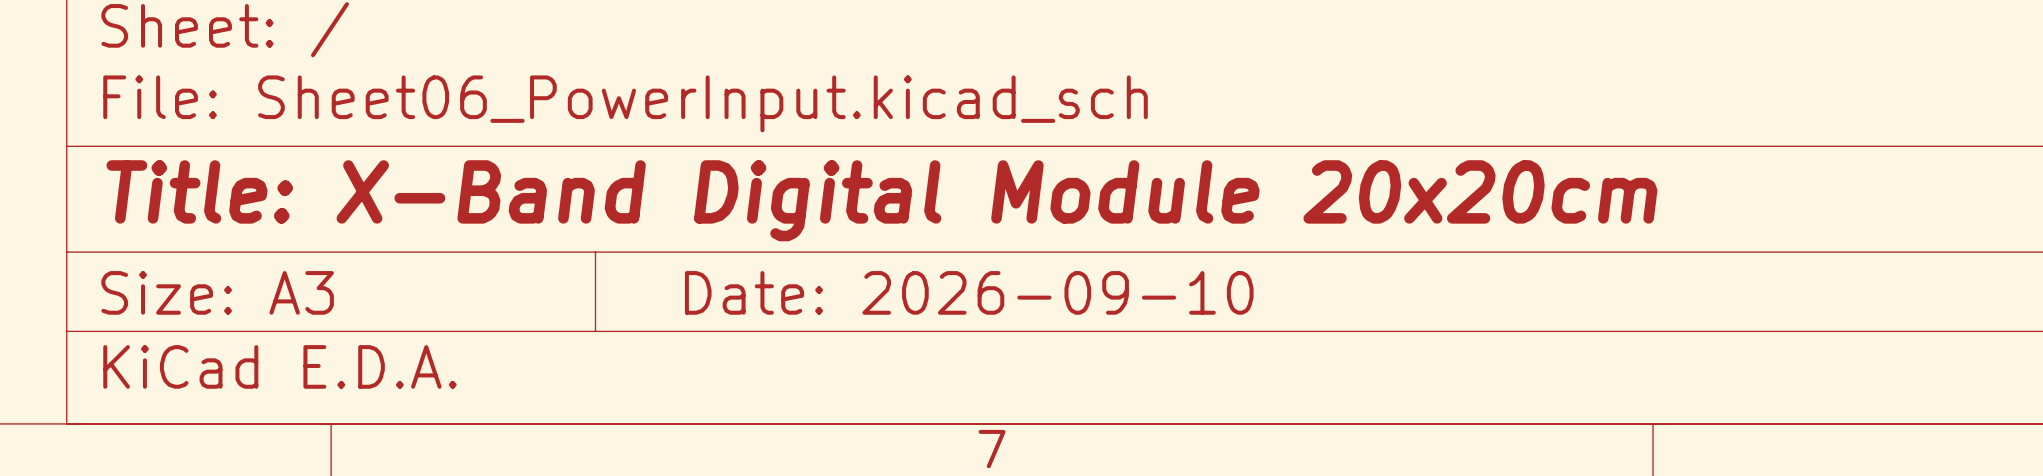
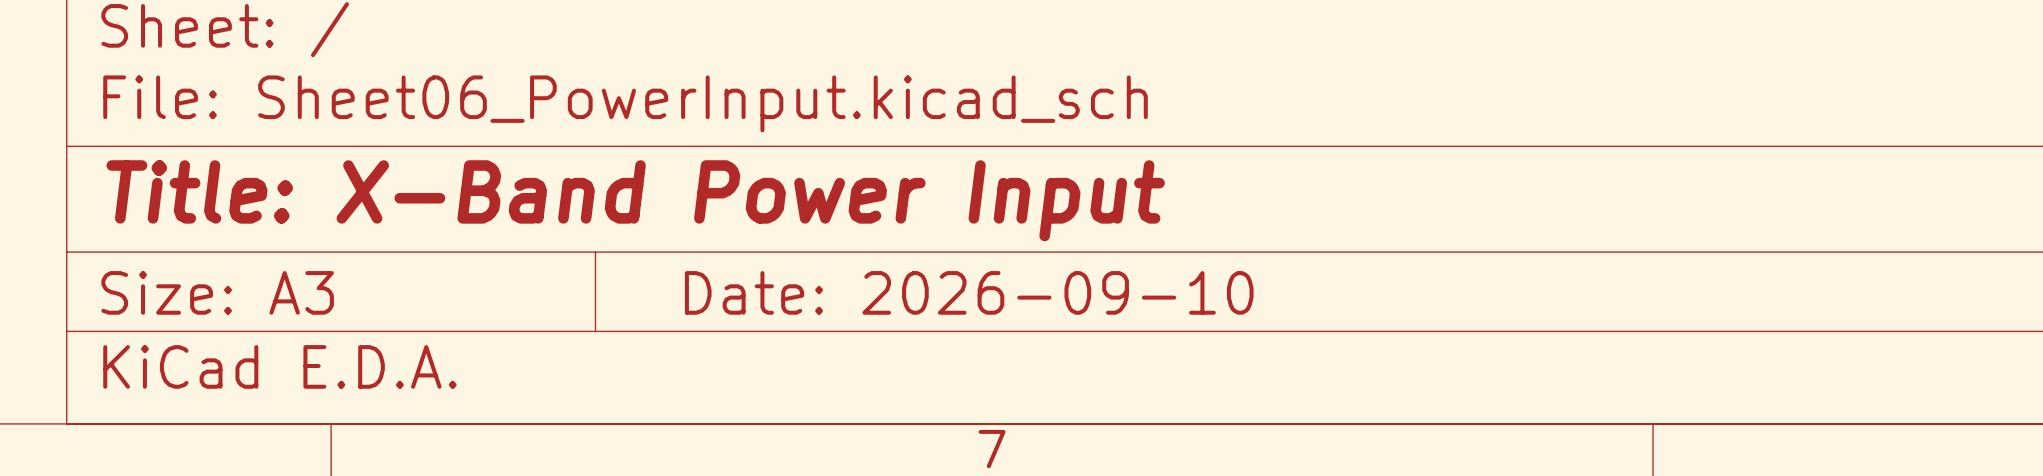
title block: Title: X-Band Digital Module 20x20cm (881, 200) -> Title: X-Band Power Input (635, 200)

